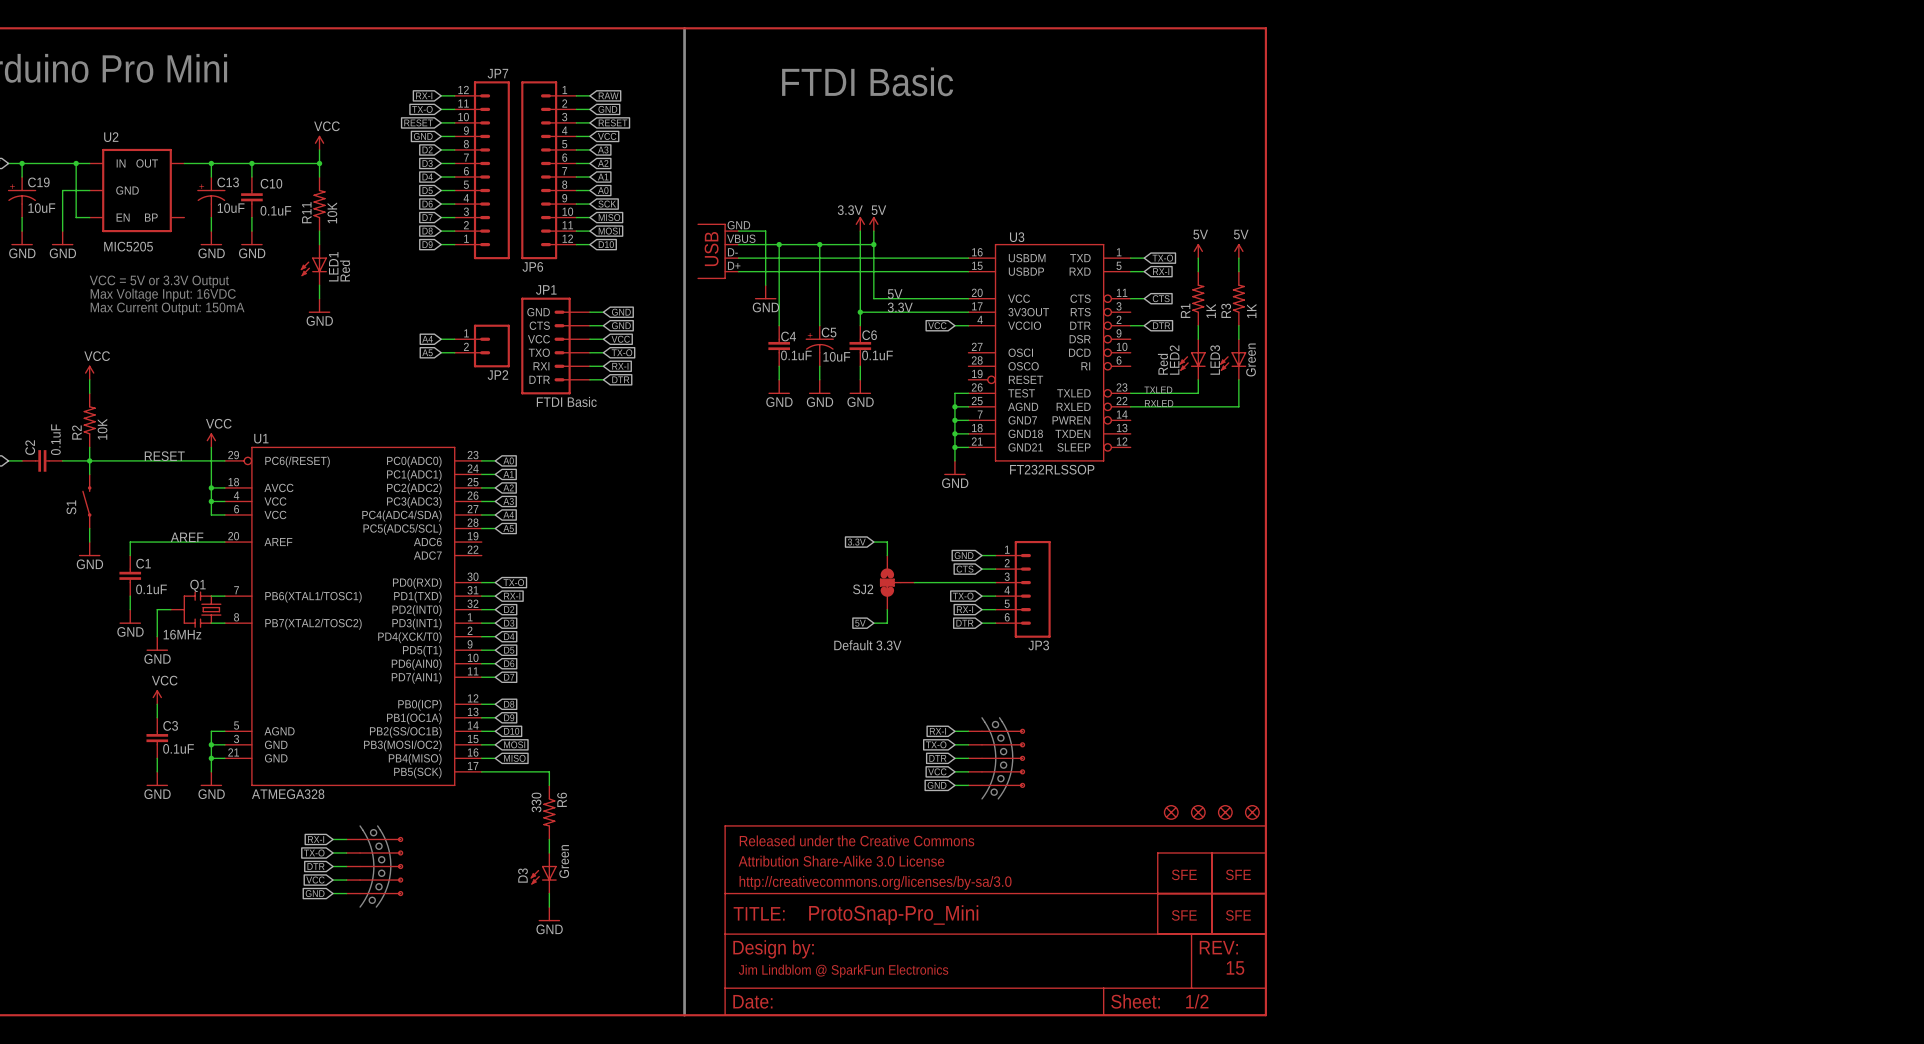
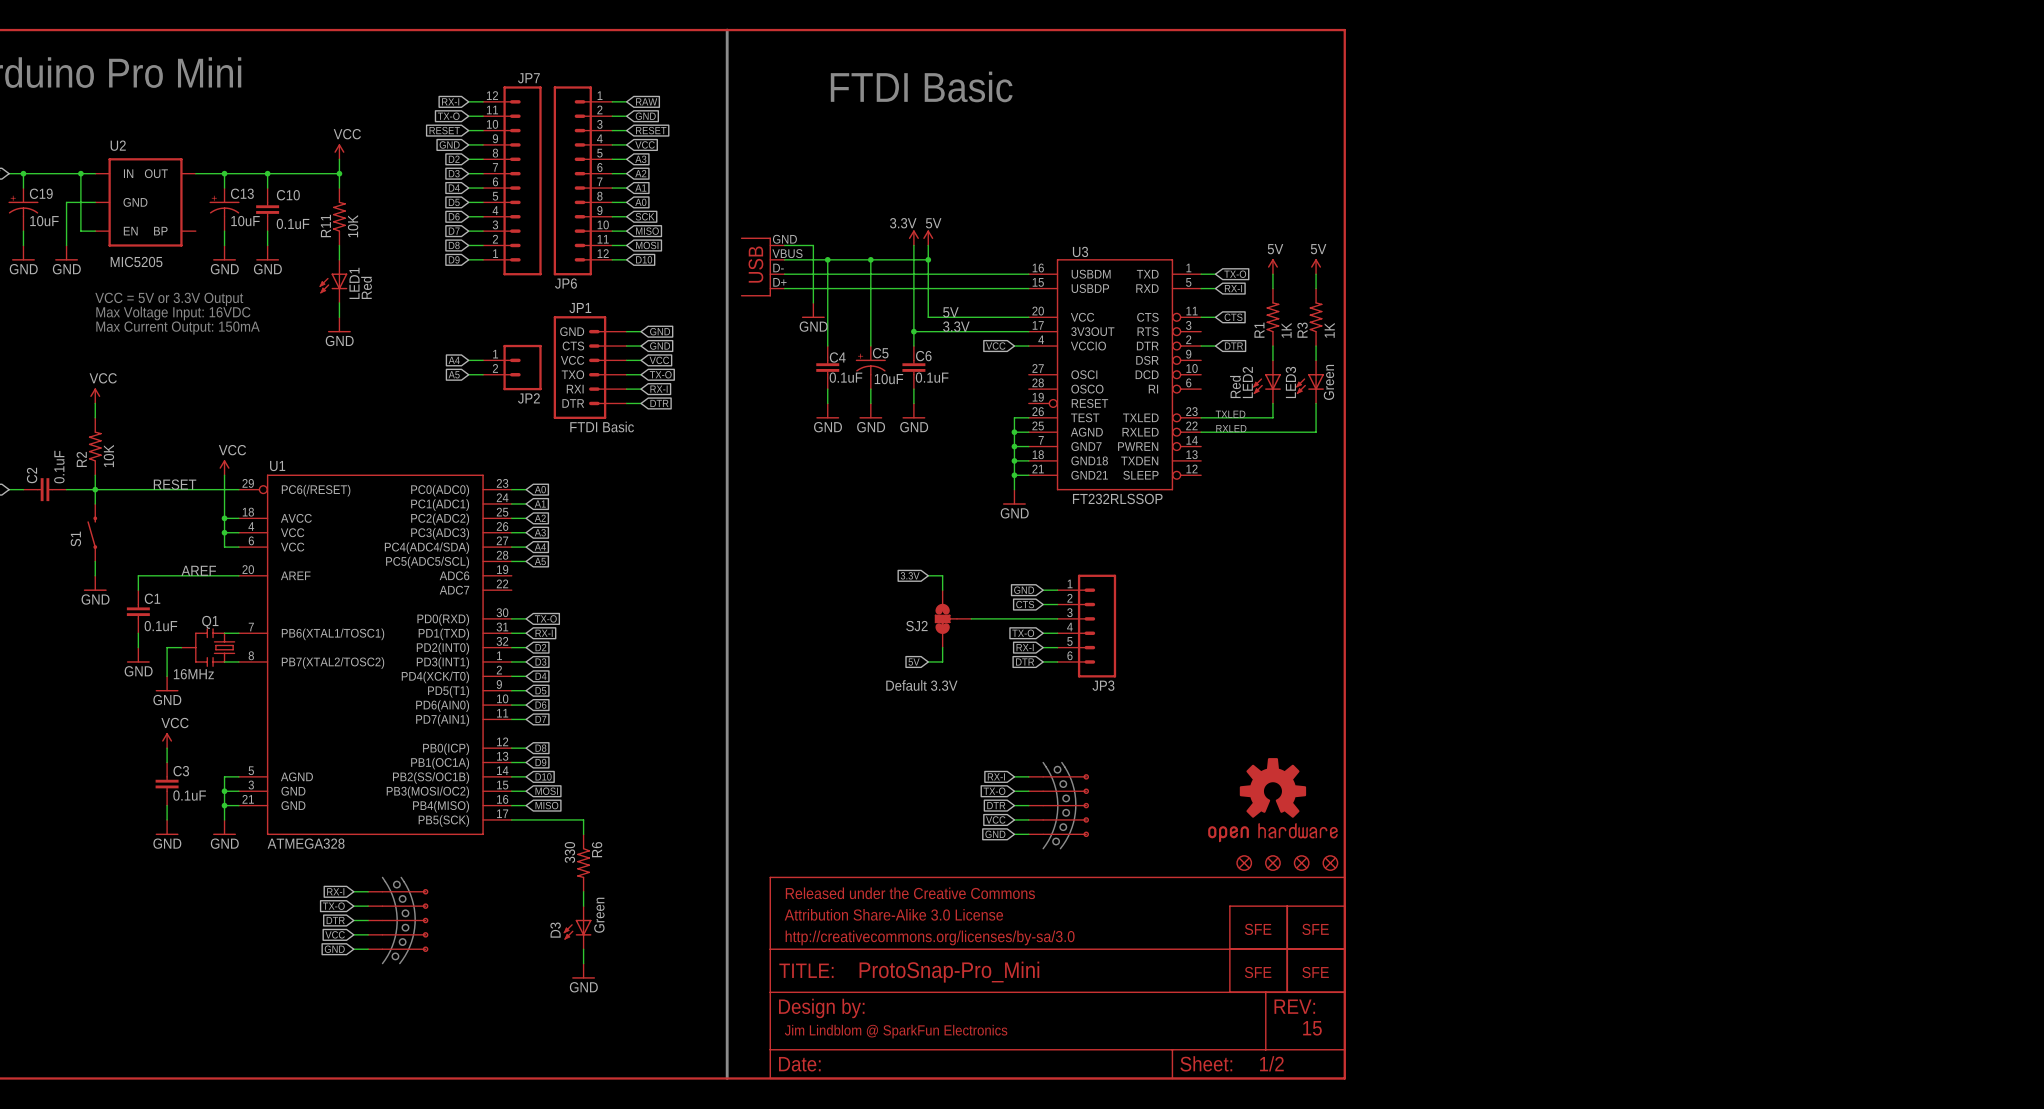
part: none -> (1272, 800)

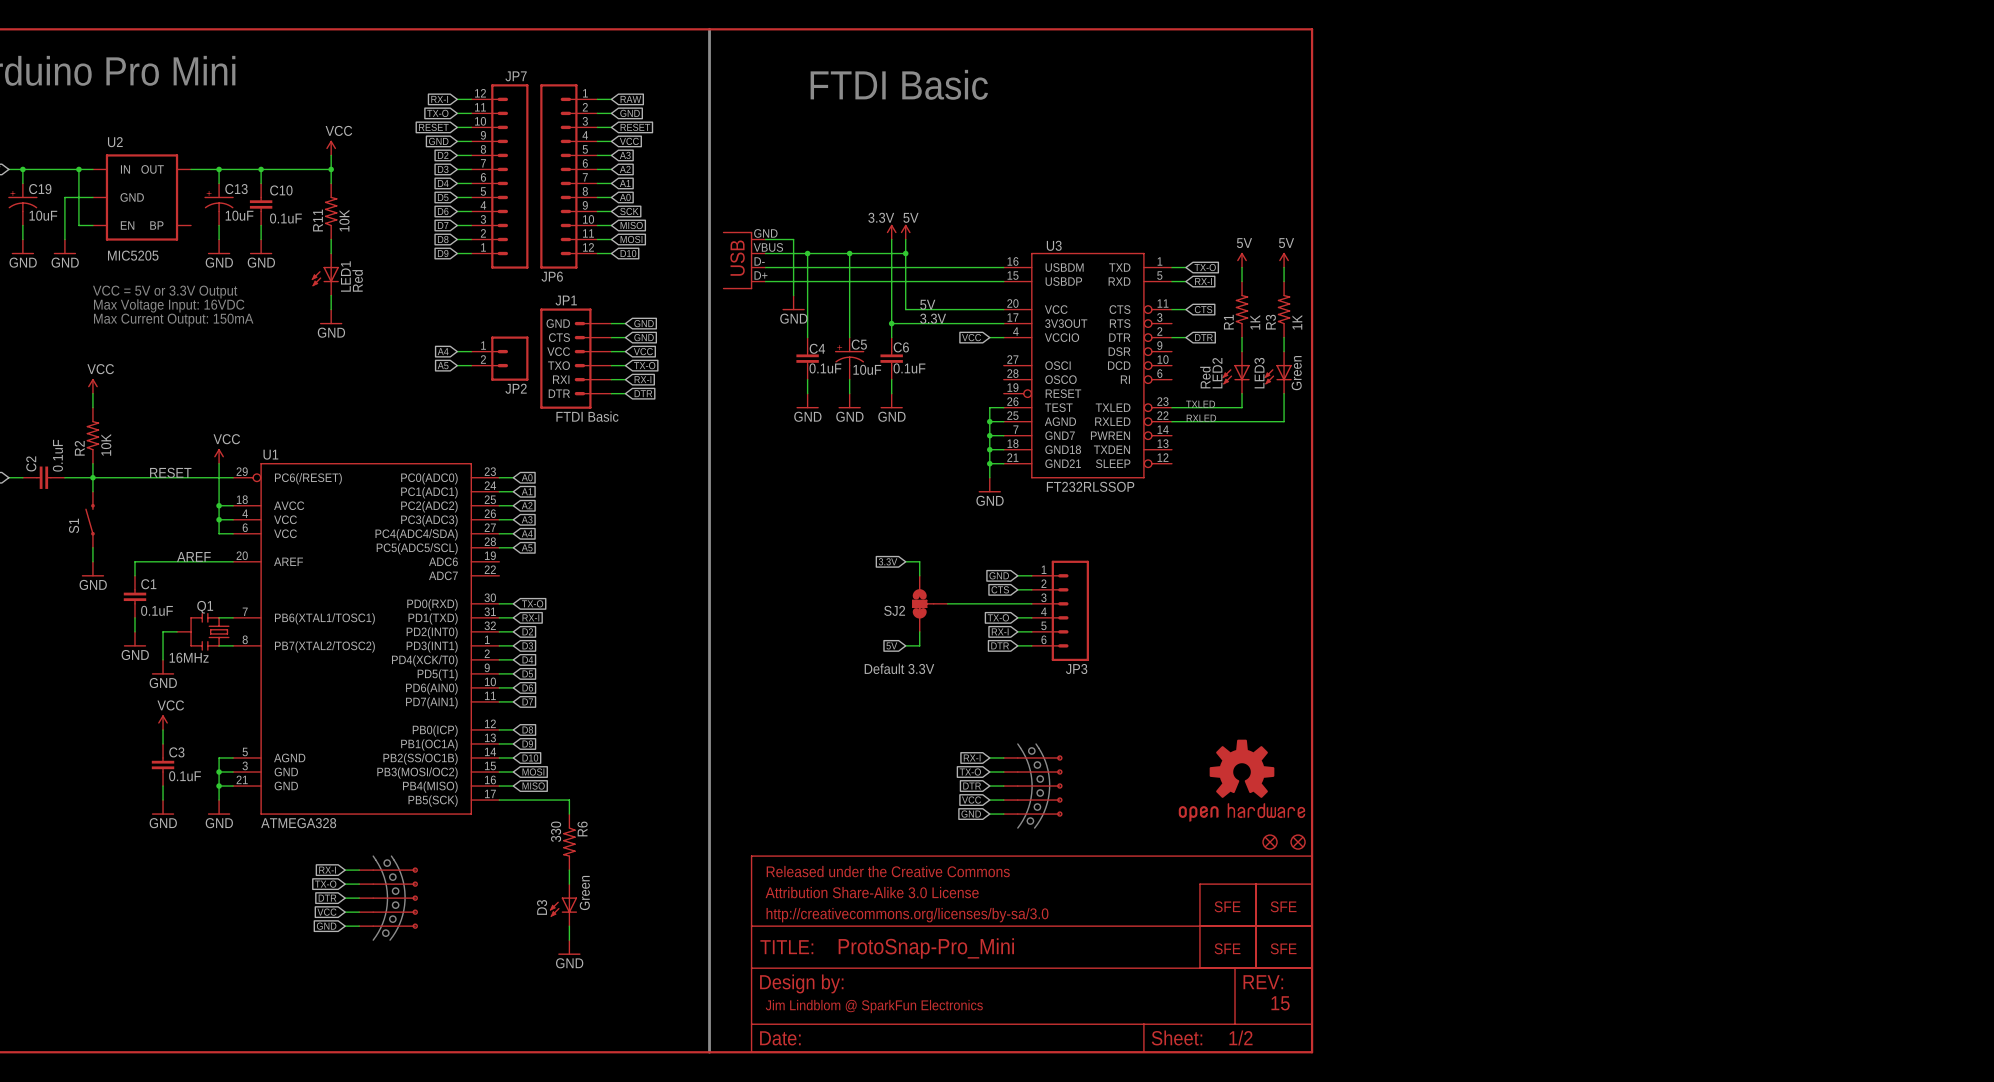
part: (1244, 863) -> none
part: (1272, 863) -> none

